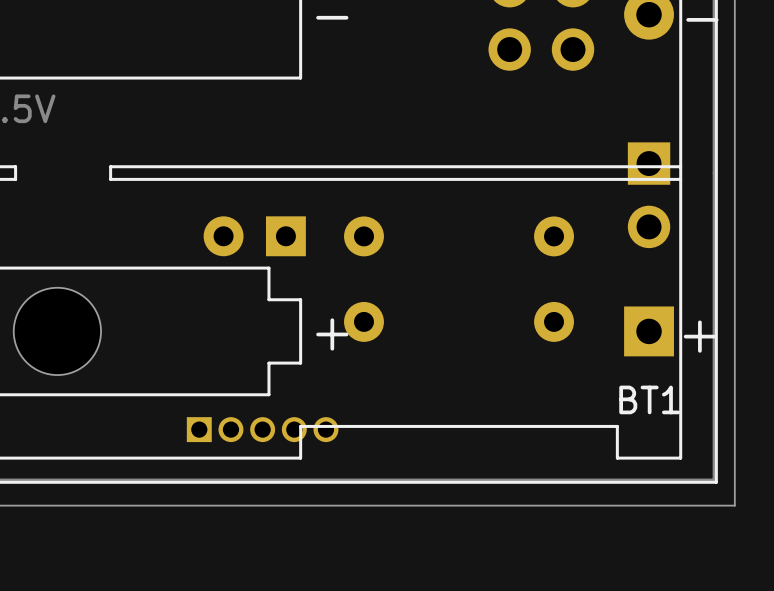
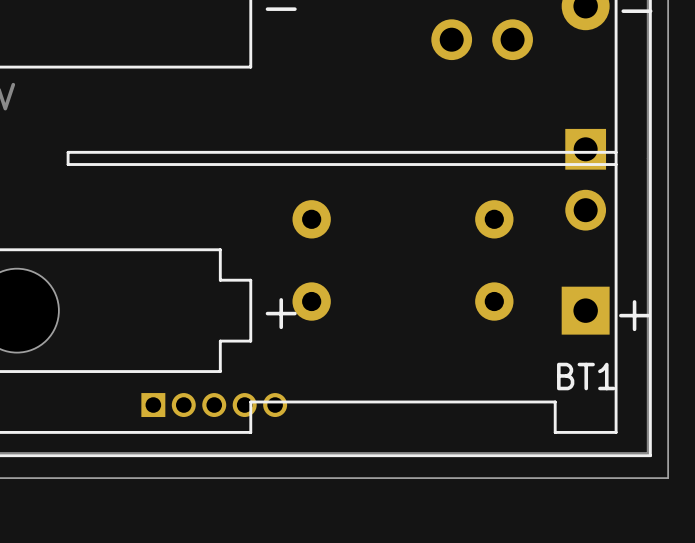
part: (254, 236) -> none

